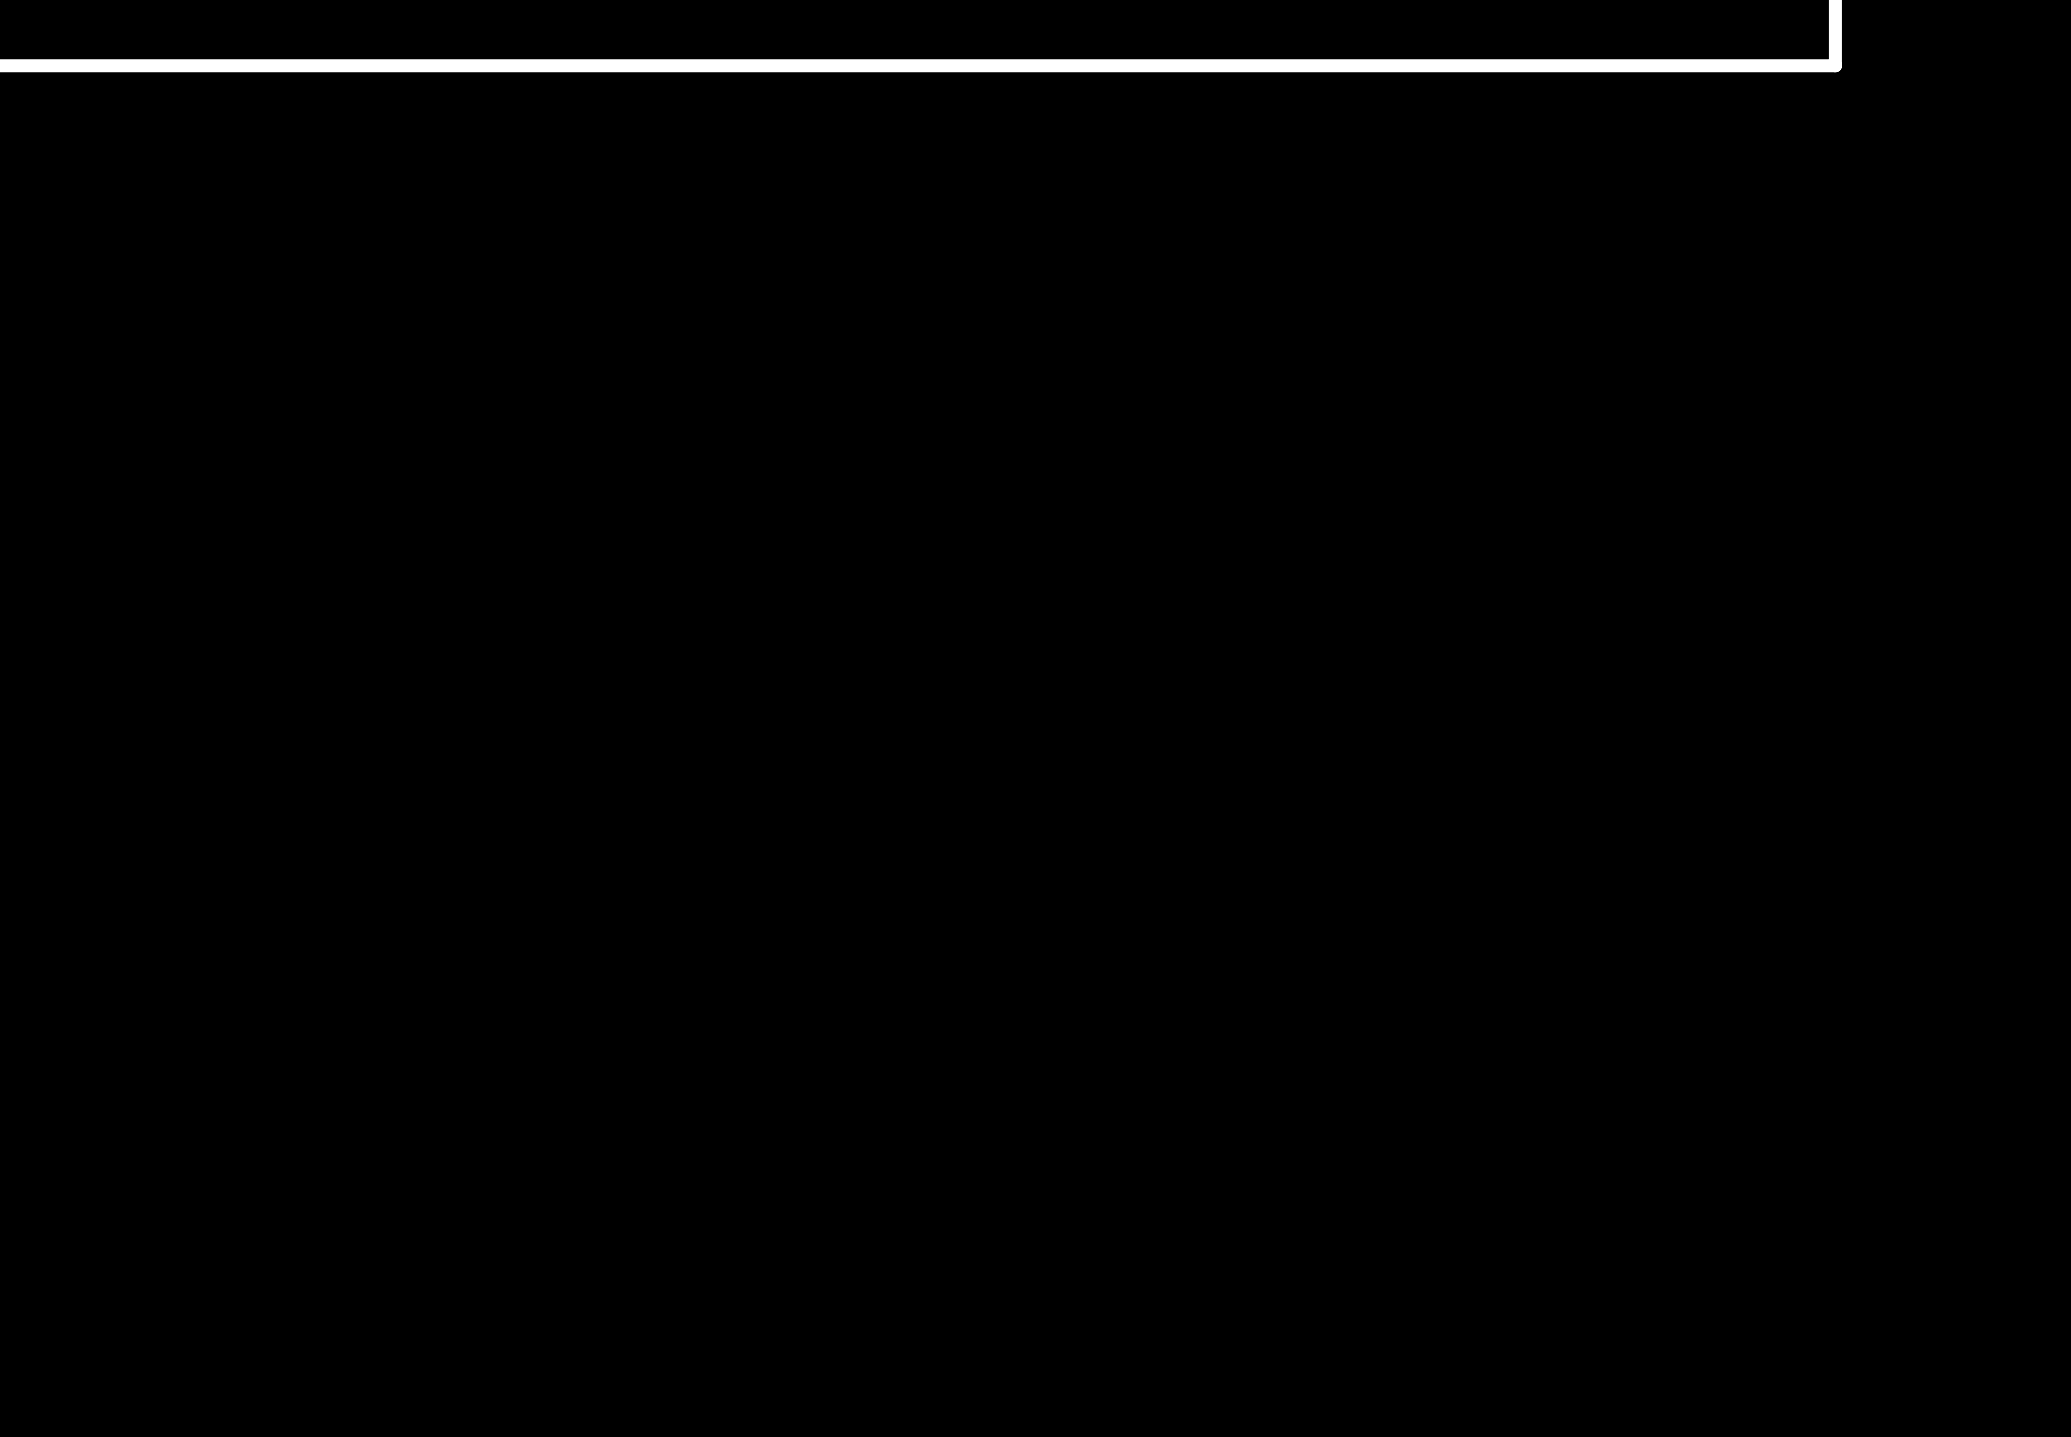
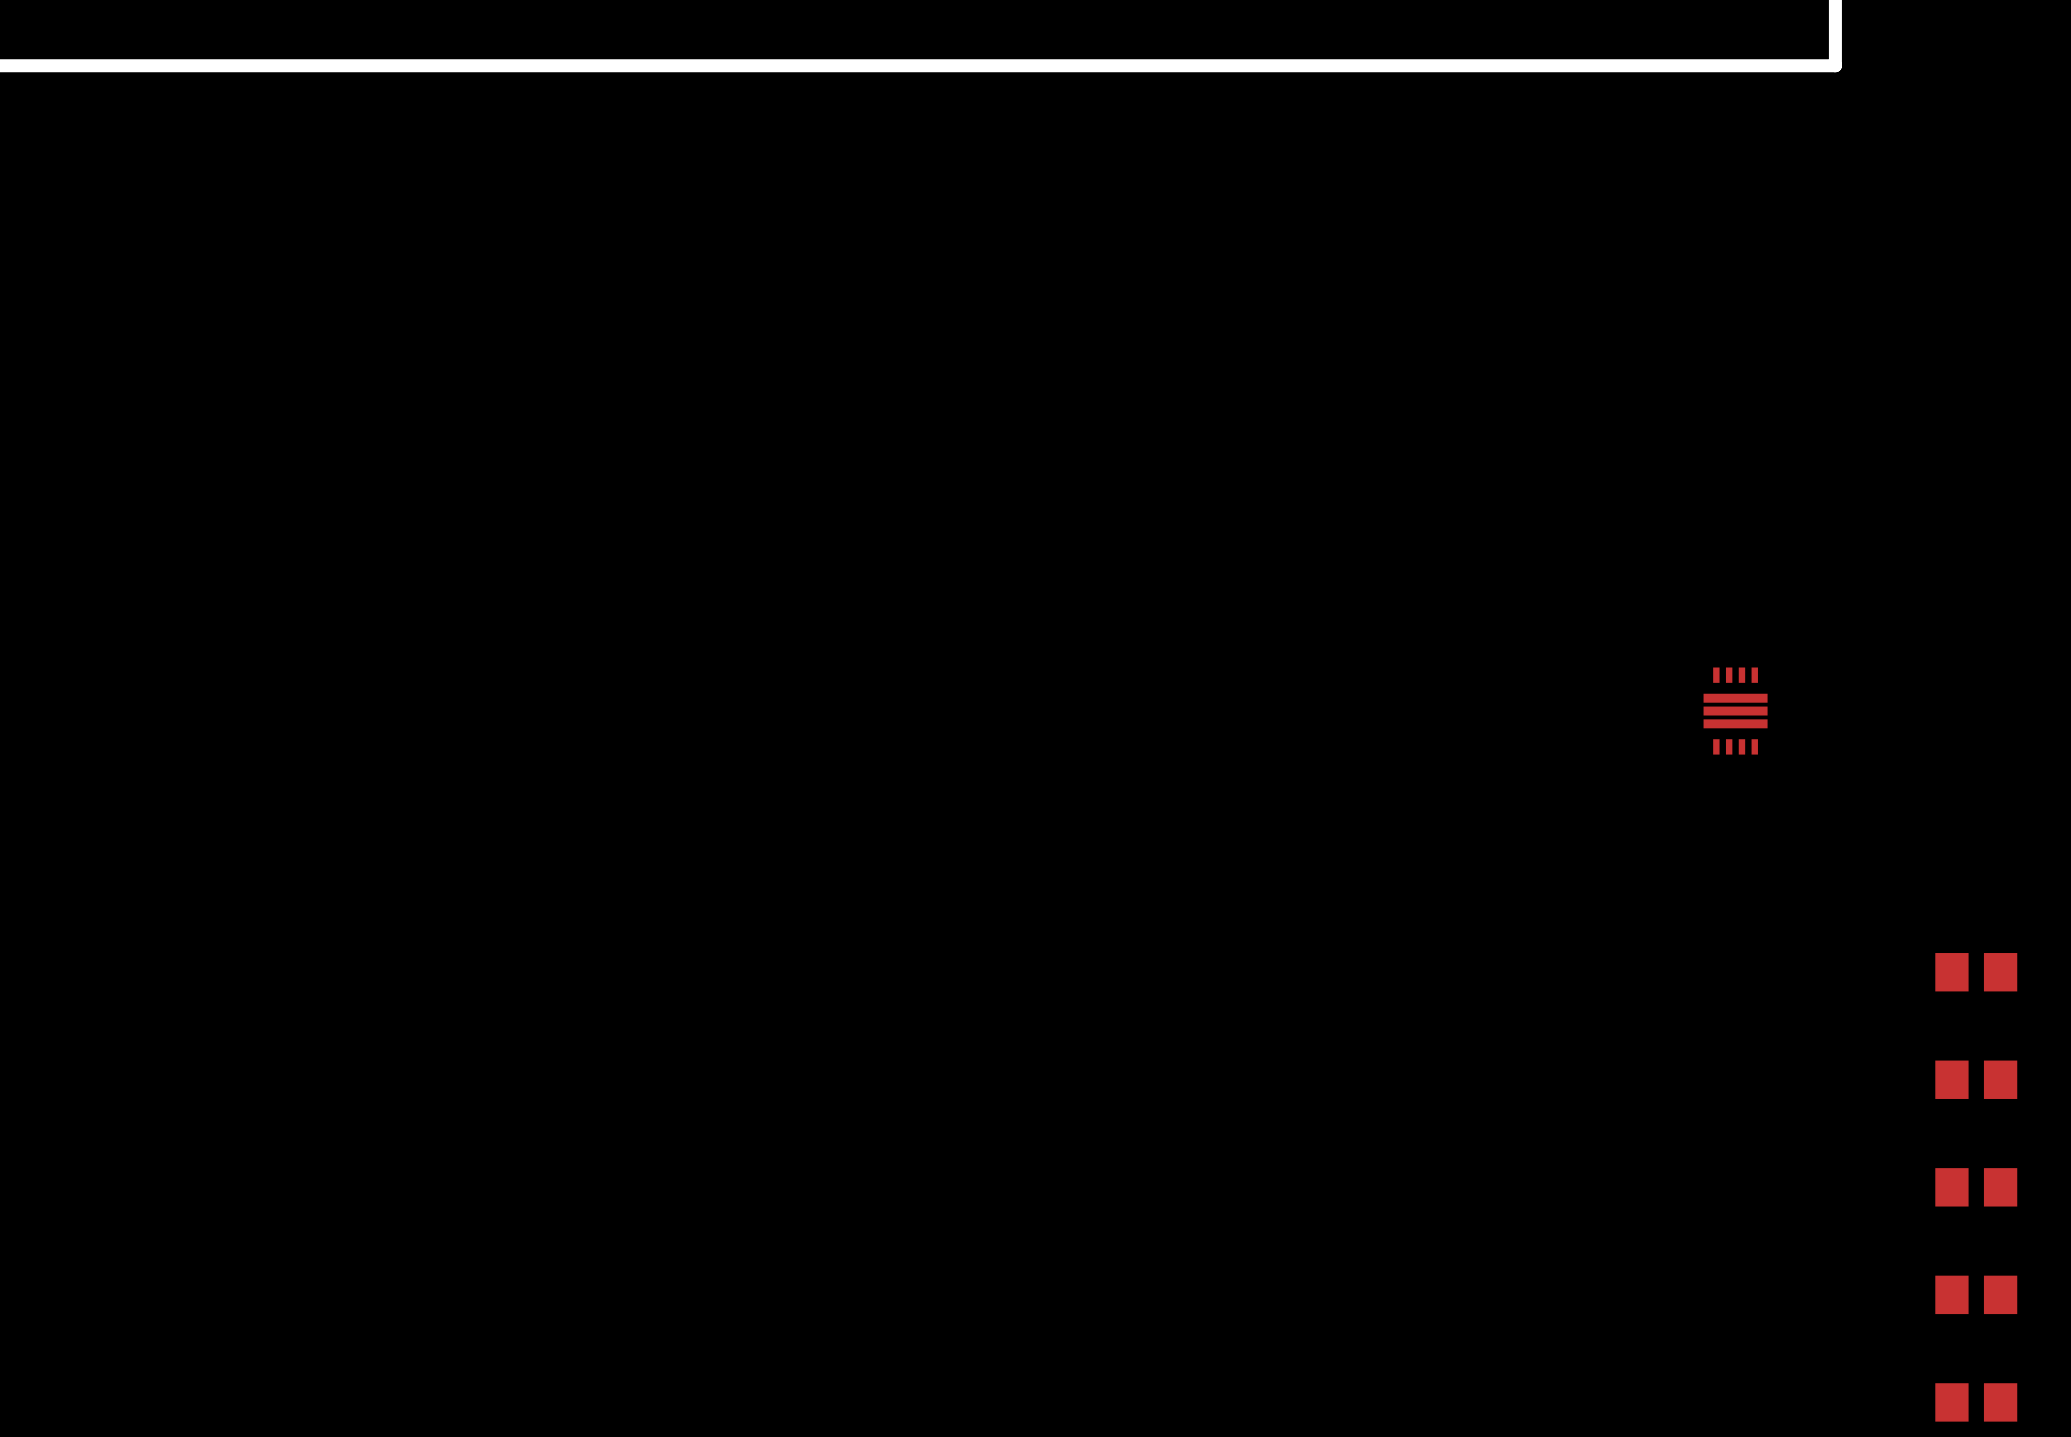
part: none -> (1735, 711)
part: none -> (1976, 972)
part: none -> (1976, 1079)
part: none -> (1976, 1187)
part: none -> (1976, 1294)
part: none -> (1976, 1402)

